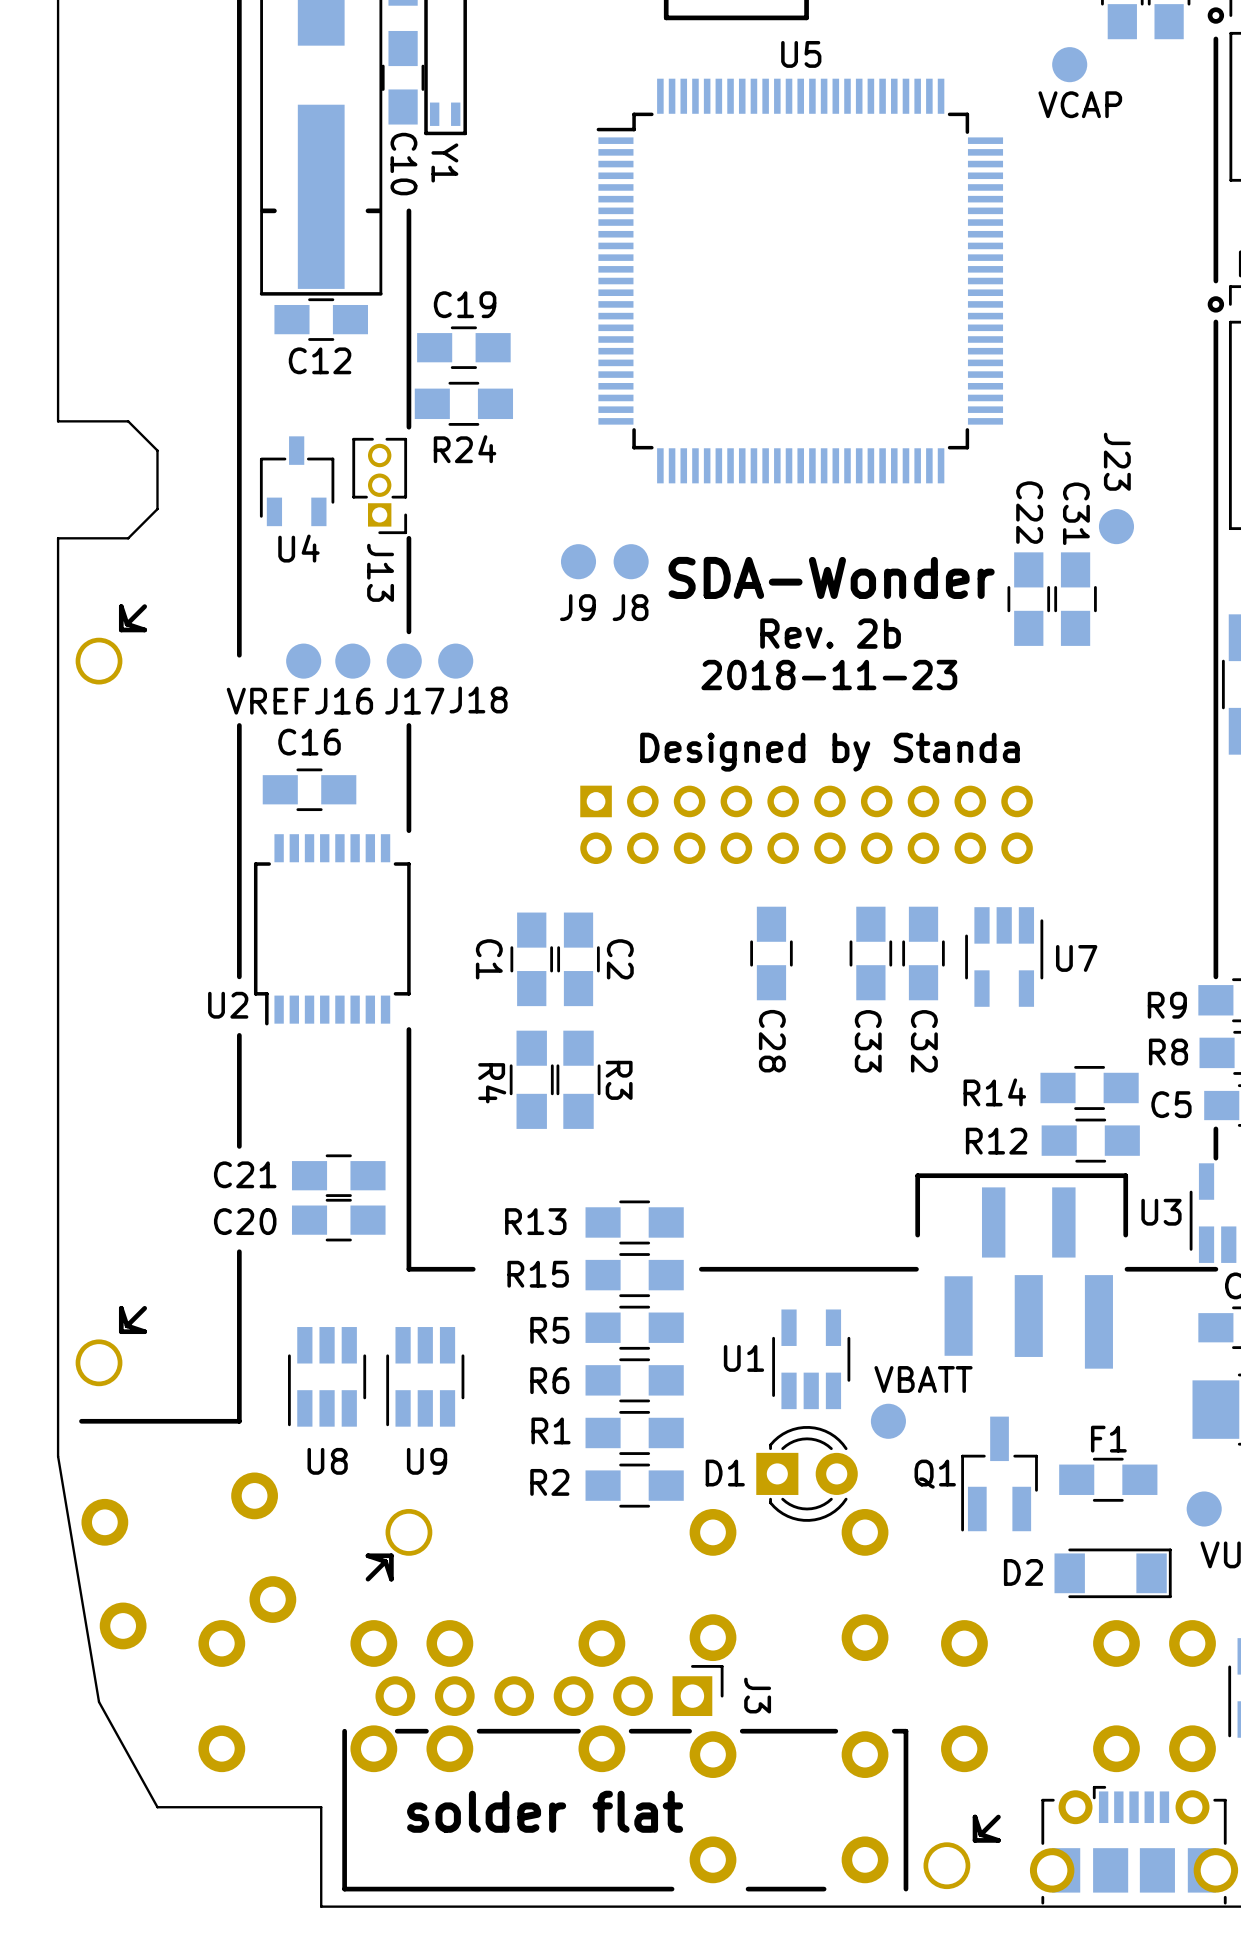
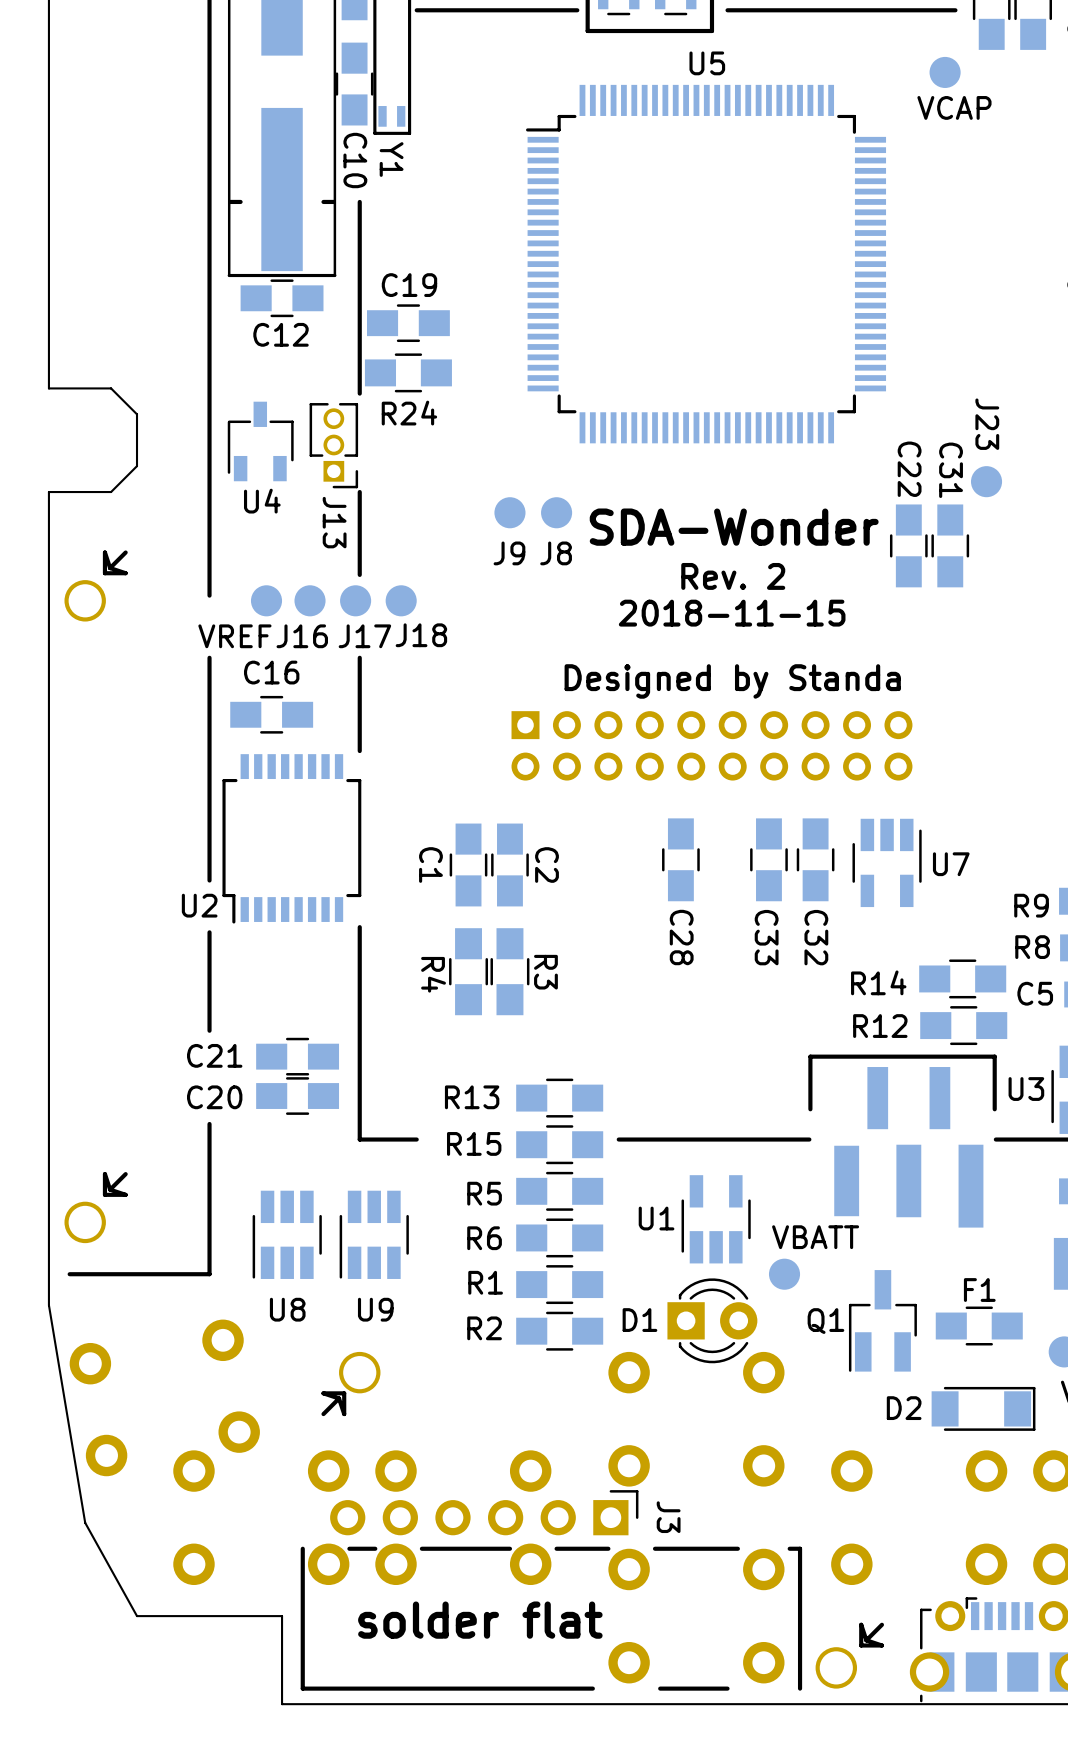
text: Rev. 2b (830, 633) -> Rev. 2 (733, 576)
text: 2018-11-23 (829, 675) -> 2018-11-15 (732, 613)

